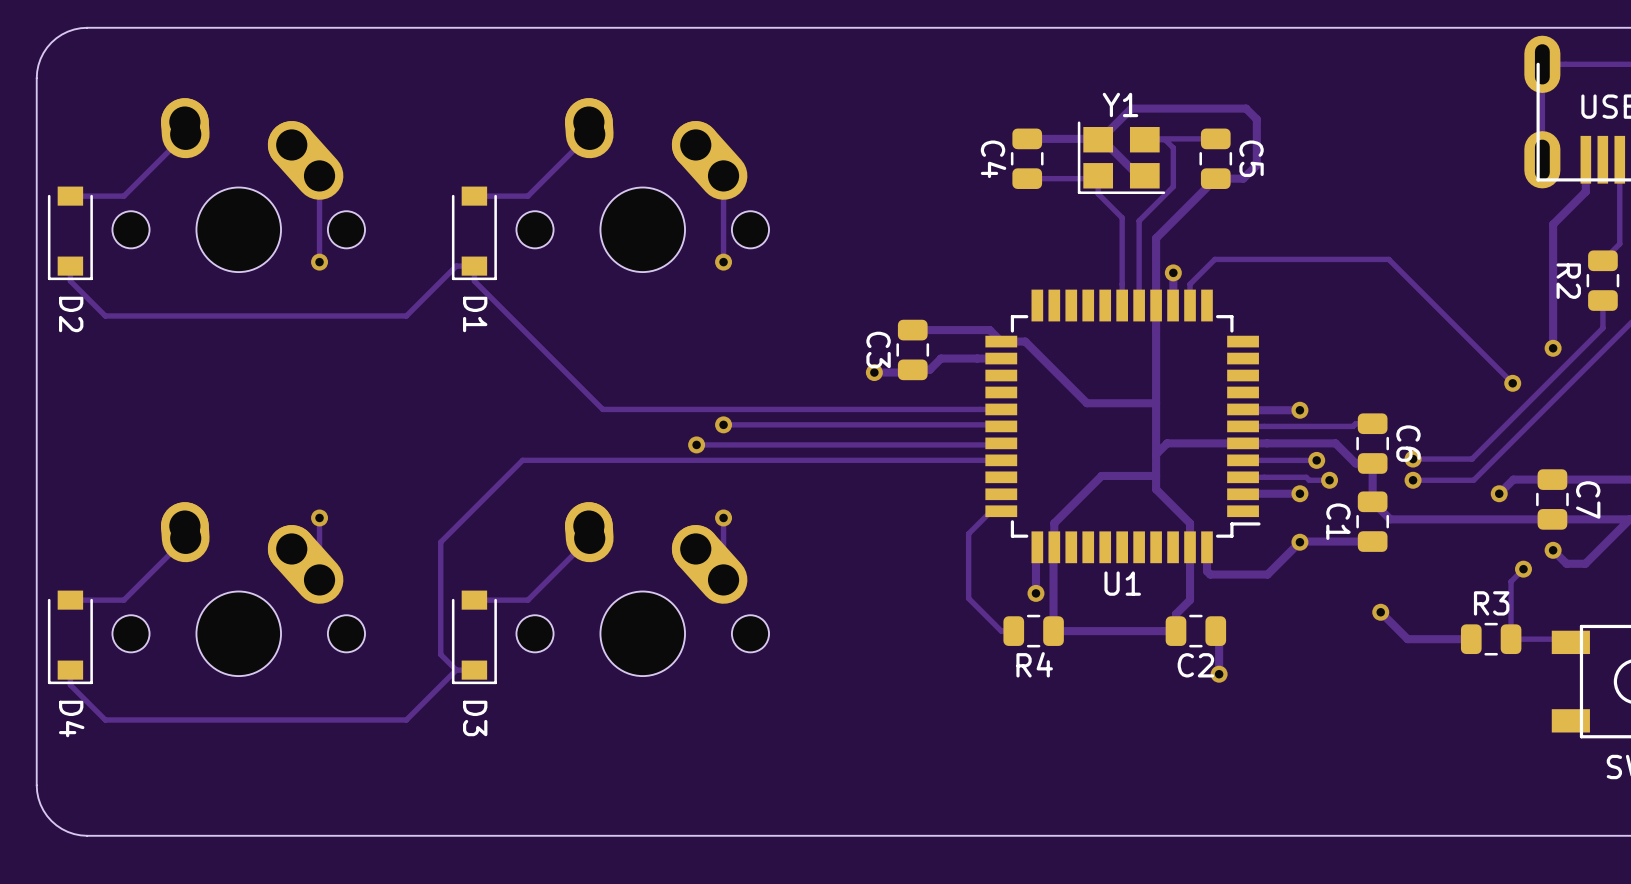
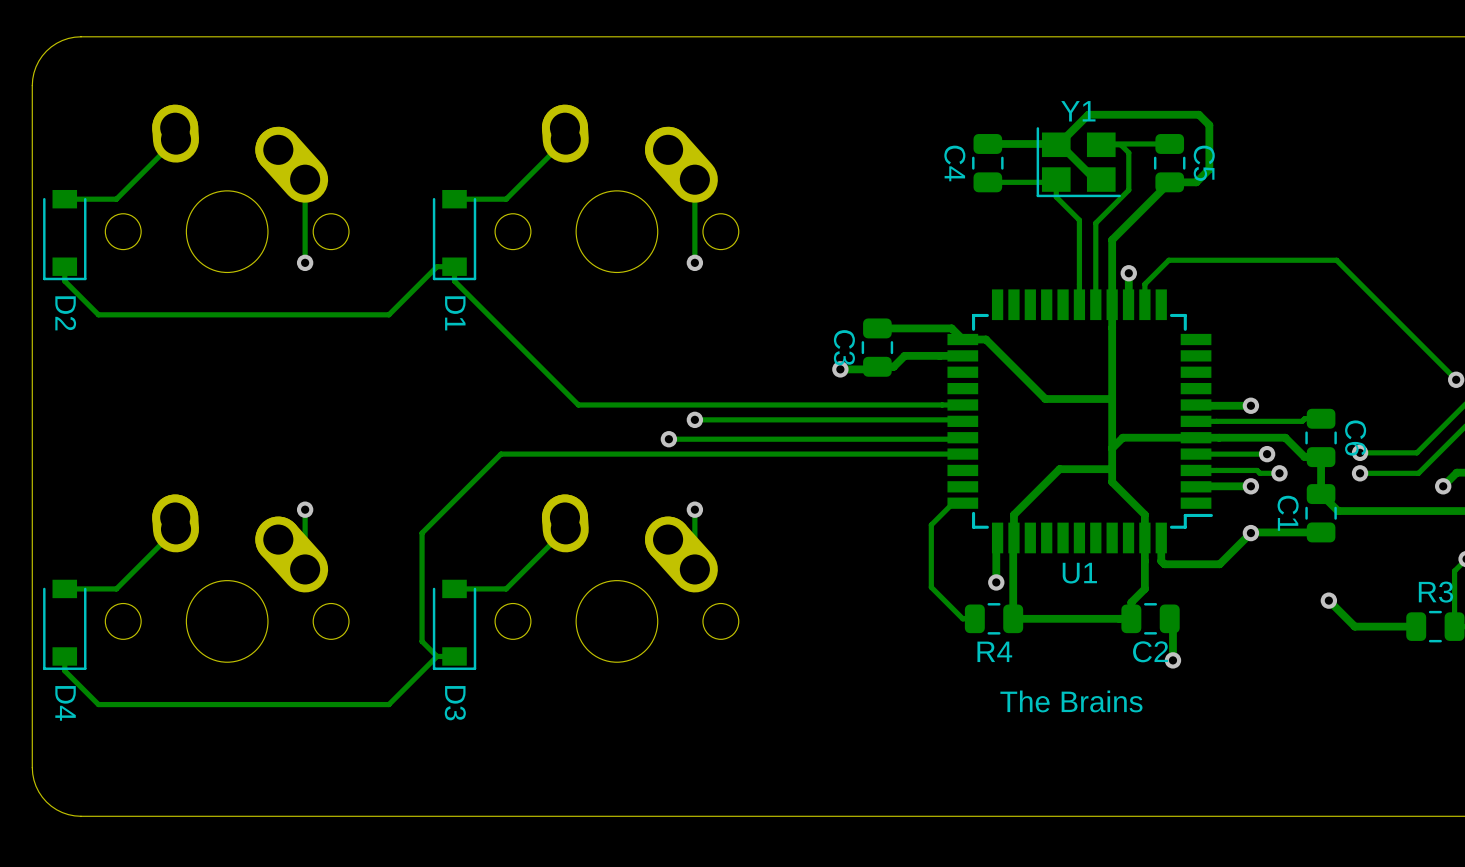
text: none -> The Brains (1071, 701)

